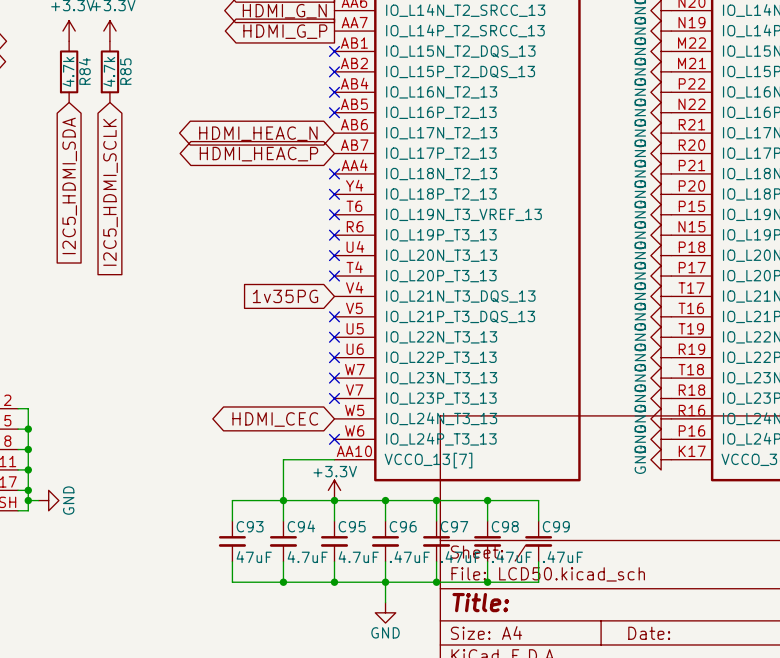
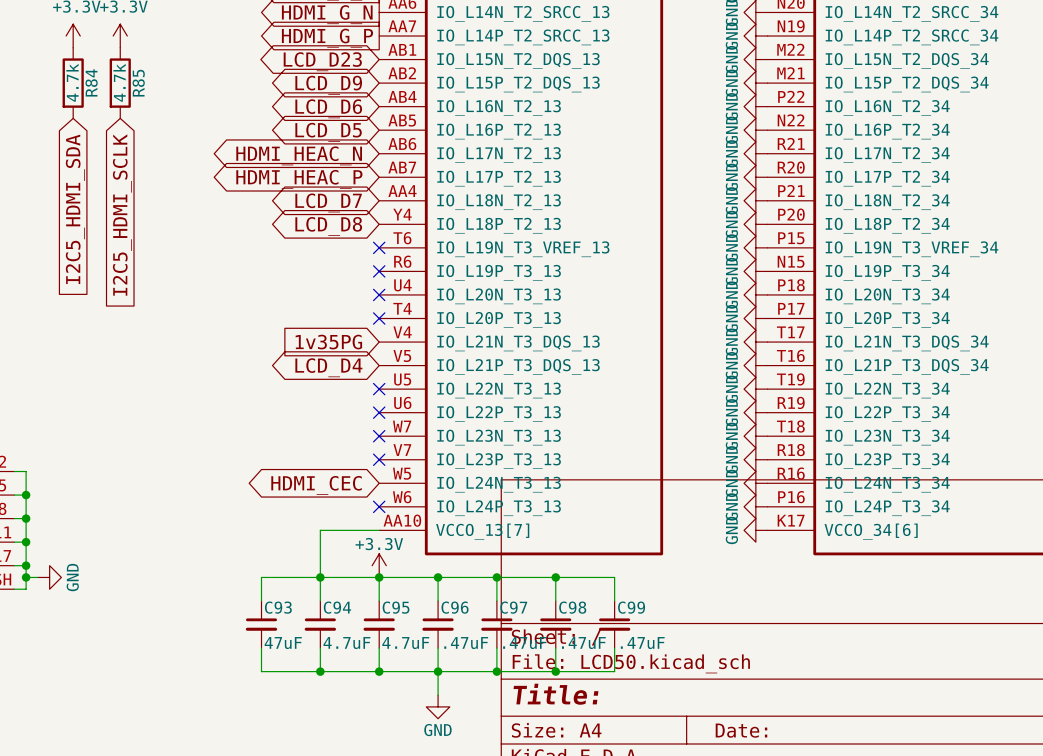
no-connect mark: (334, 51) -> none
global label: none -> LCD_D23 (322, 61)
no-connect mark: (334, 71) -> none
global label: none -> LCD_D9 (328, 85)
global label: none -> LCD_D6 (328, 108)
no-connect mark: (334, 92) -> none
no-connect mark: (334, 112) -> none
global label: none -> LCD_D5 (328, 132)
no-connect mark: (334, 173) -> none
global label: none -> LCD_D7 (328, 202)
global label: none -> LCD_D8 (328, 226)
no-connect mark: (334, 194) -> none
no-connect mark: (334, 316) -> none
global label: none -> LCD_D4 (328, 367)

